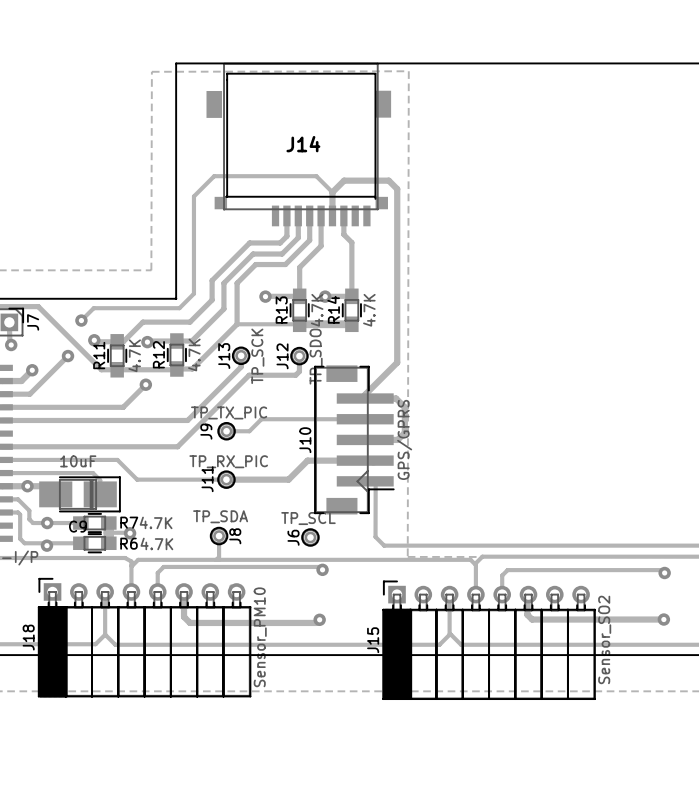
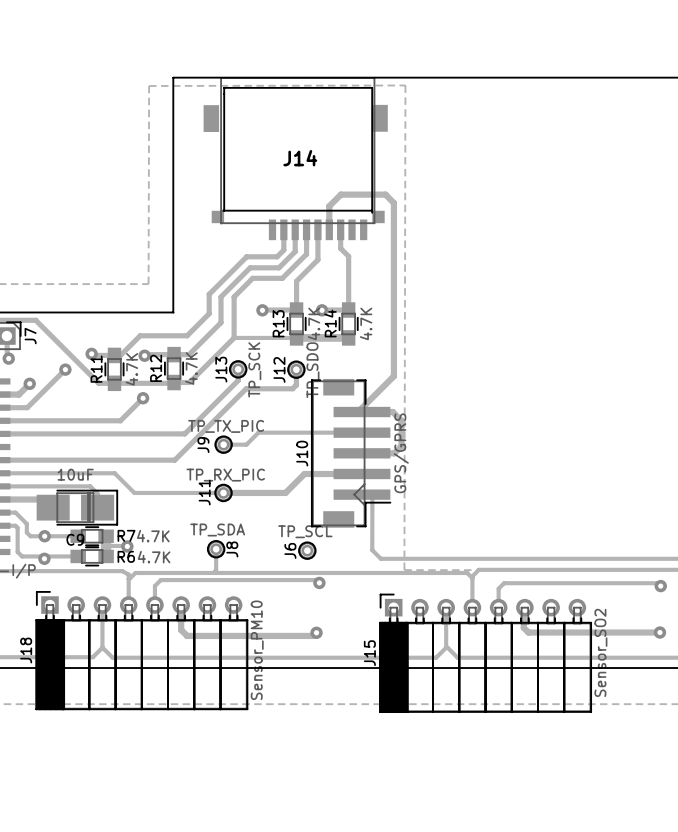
track: (332, 192) (316, 176) (214, 176) (193, 196) (193, 293) (179, 308) (93, 308) (81, 320) -> none
via: (81, 320) -> none
via: (27, 486) -> none

